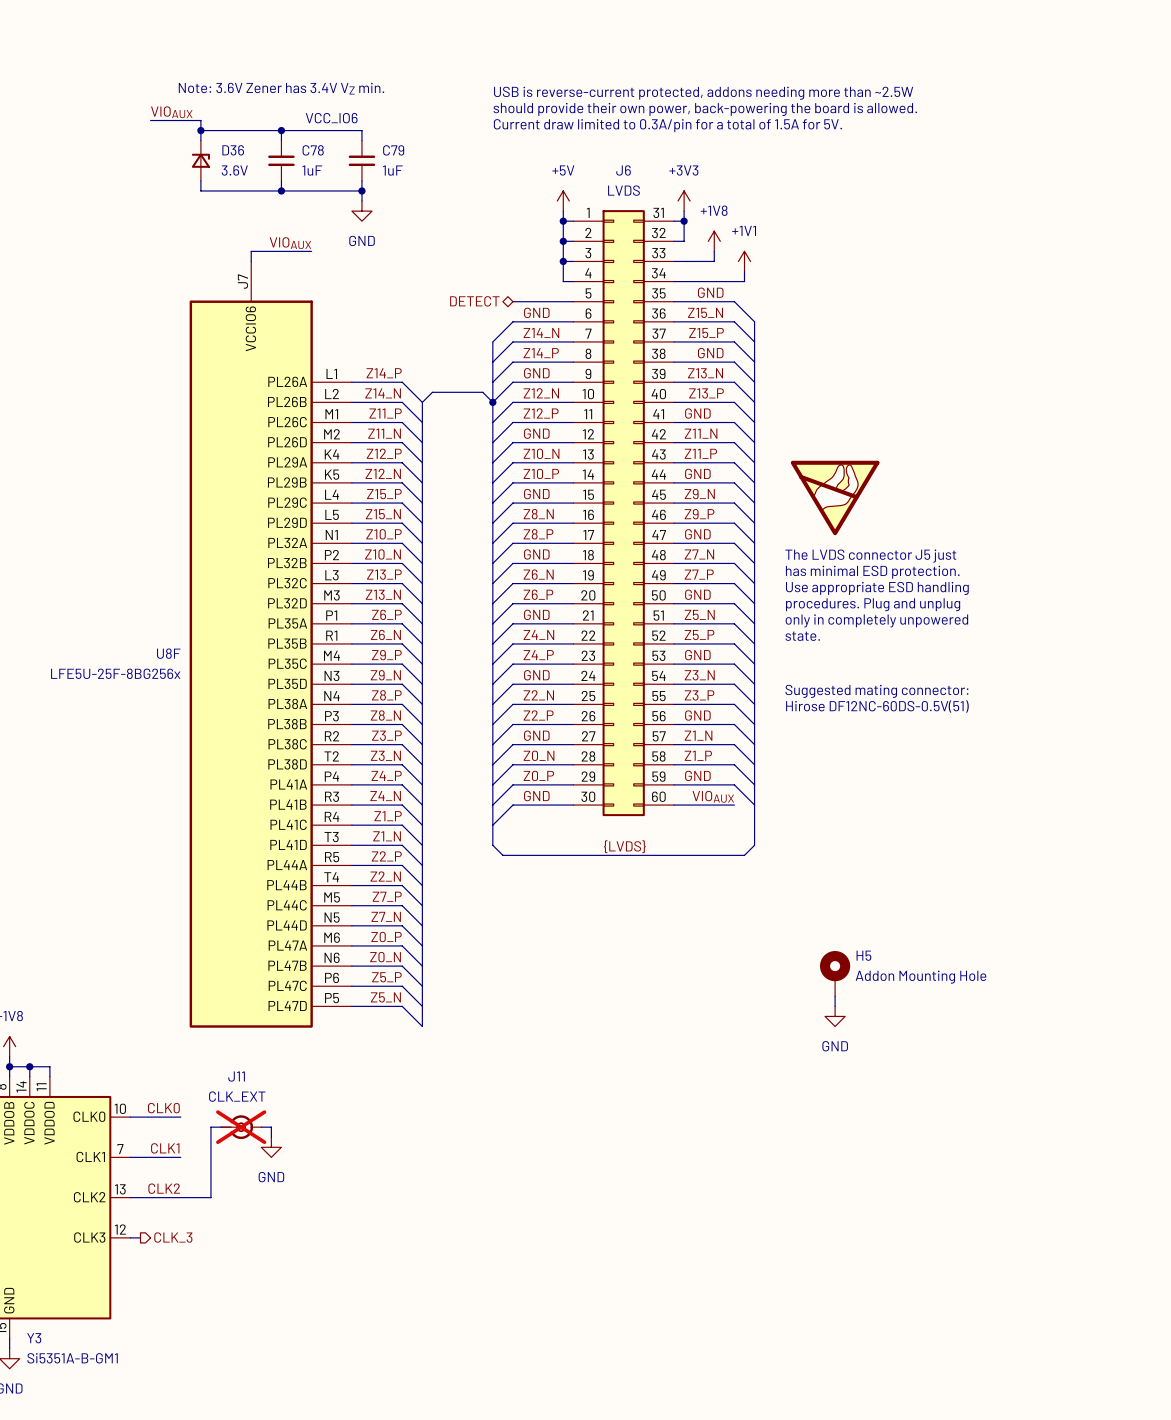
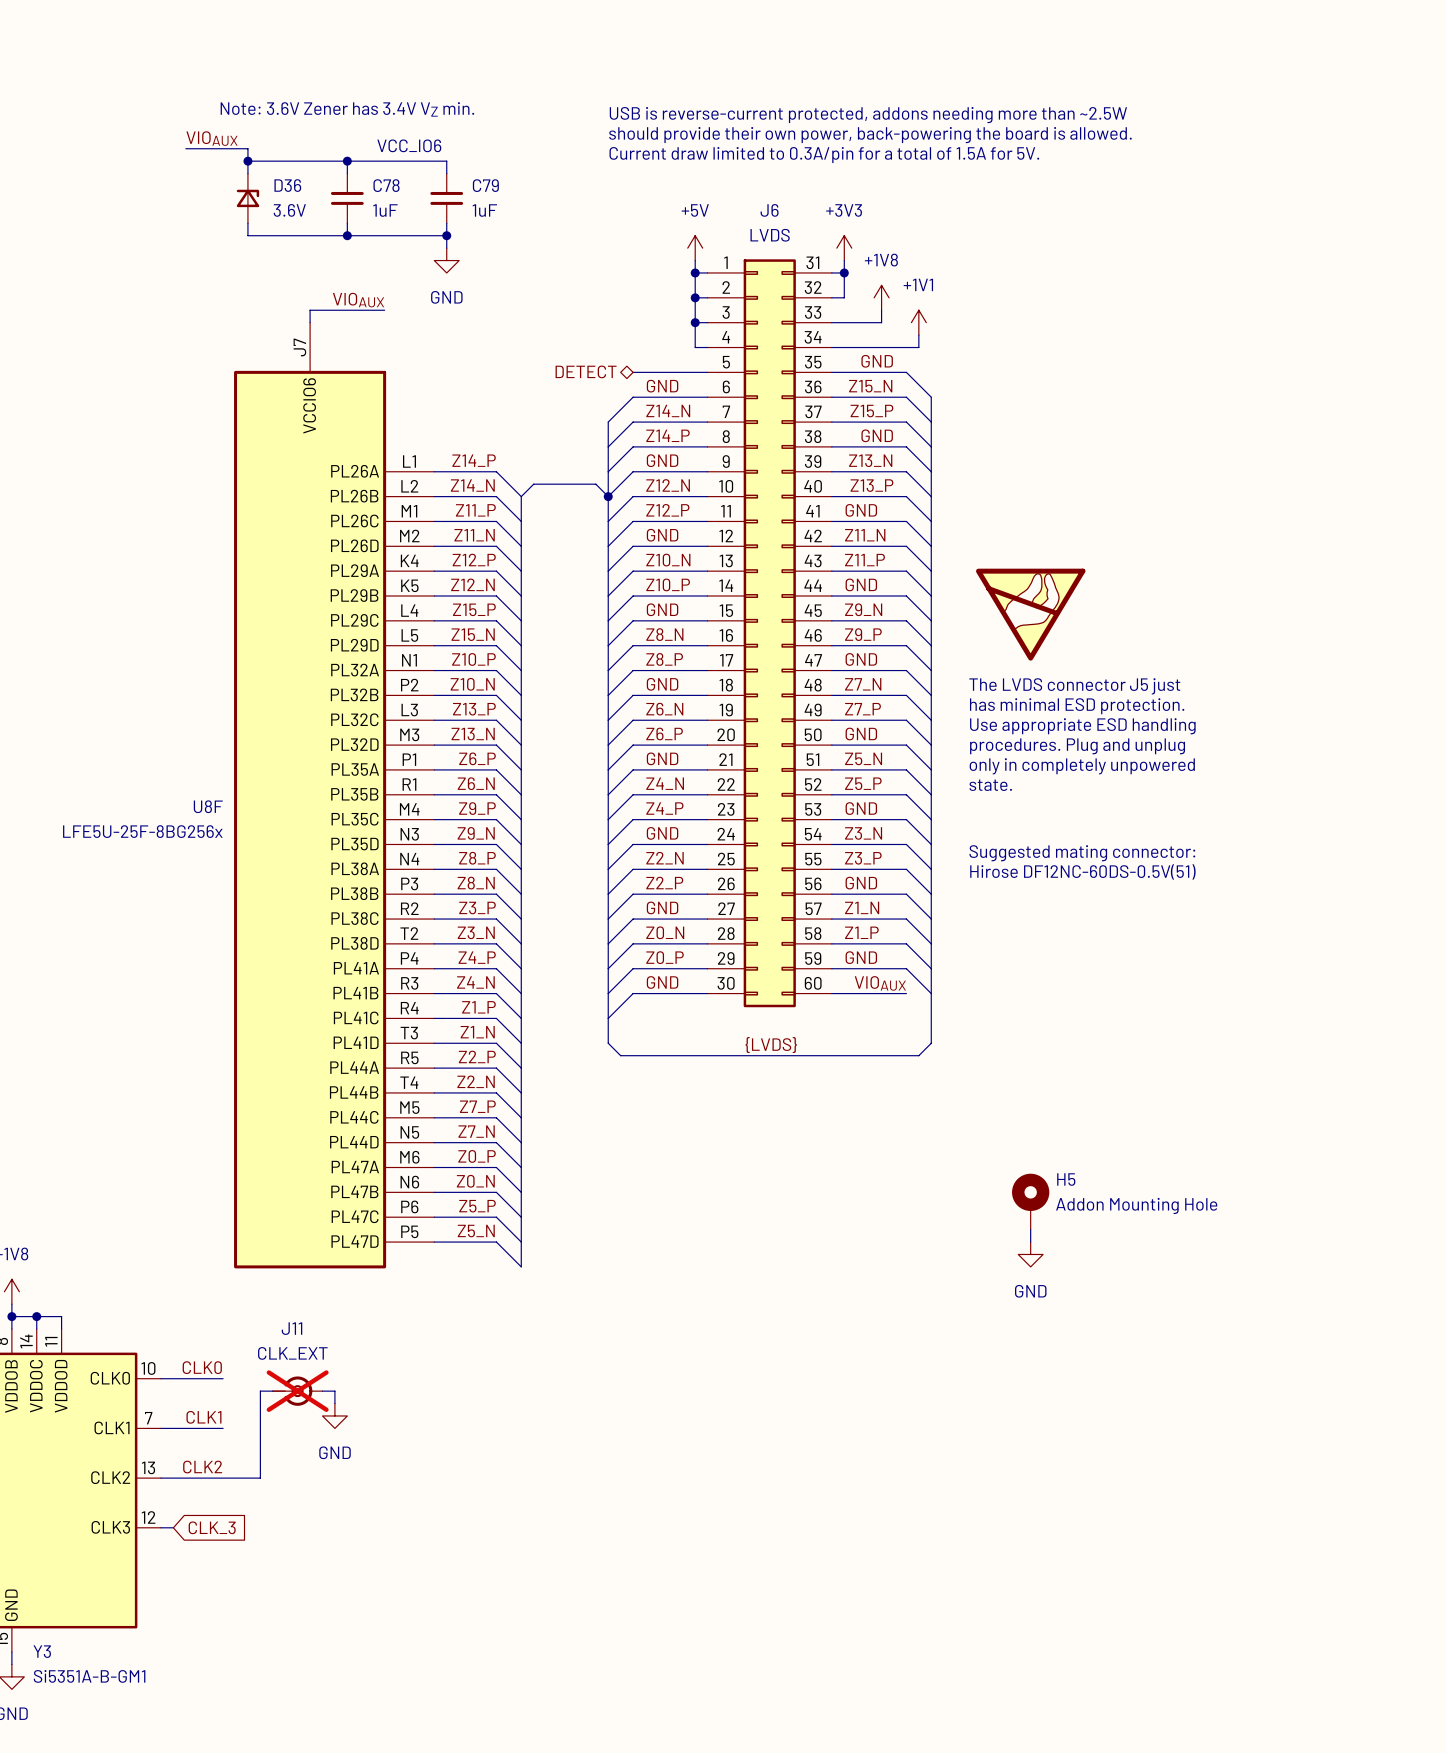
global label: none -> CLK_3 (212, 1527)
hierarchical label: CLK_3 (173, 1237) -> none

